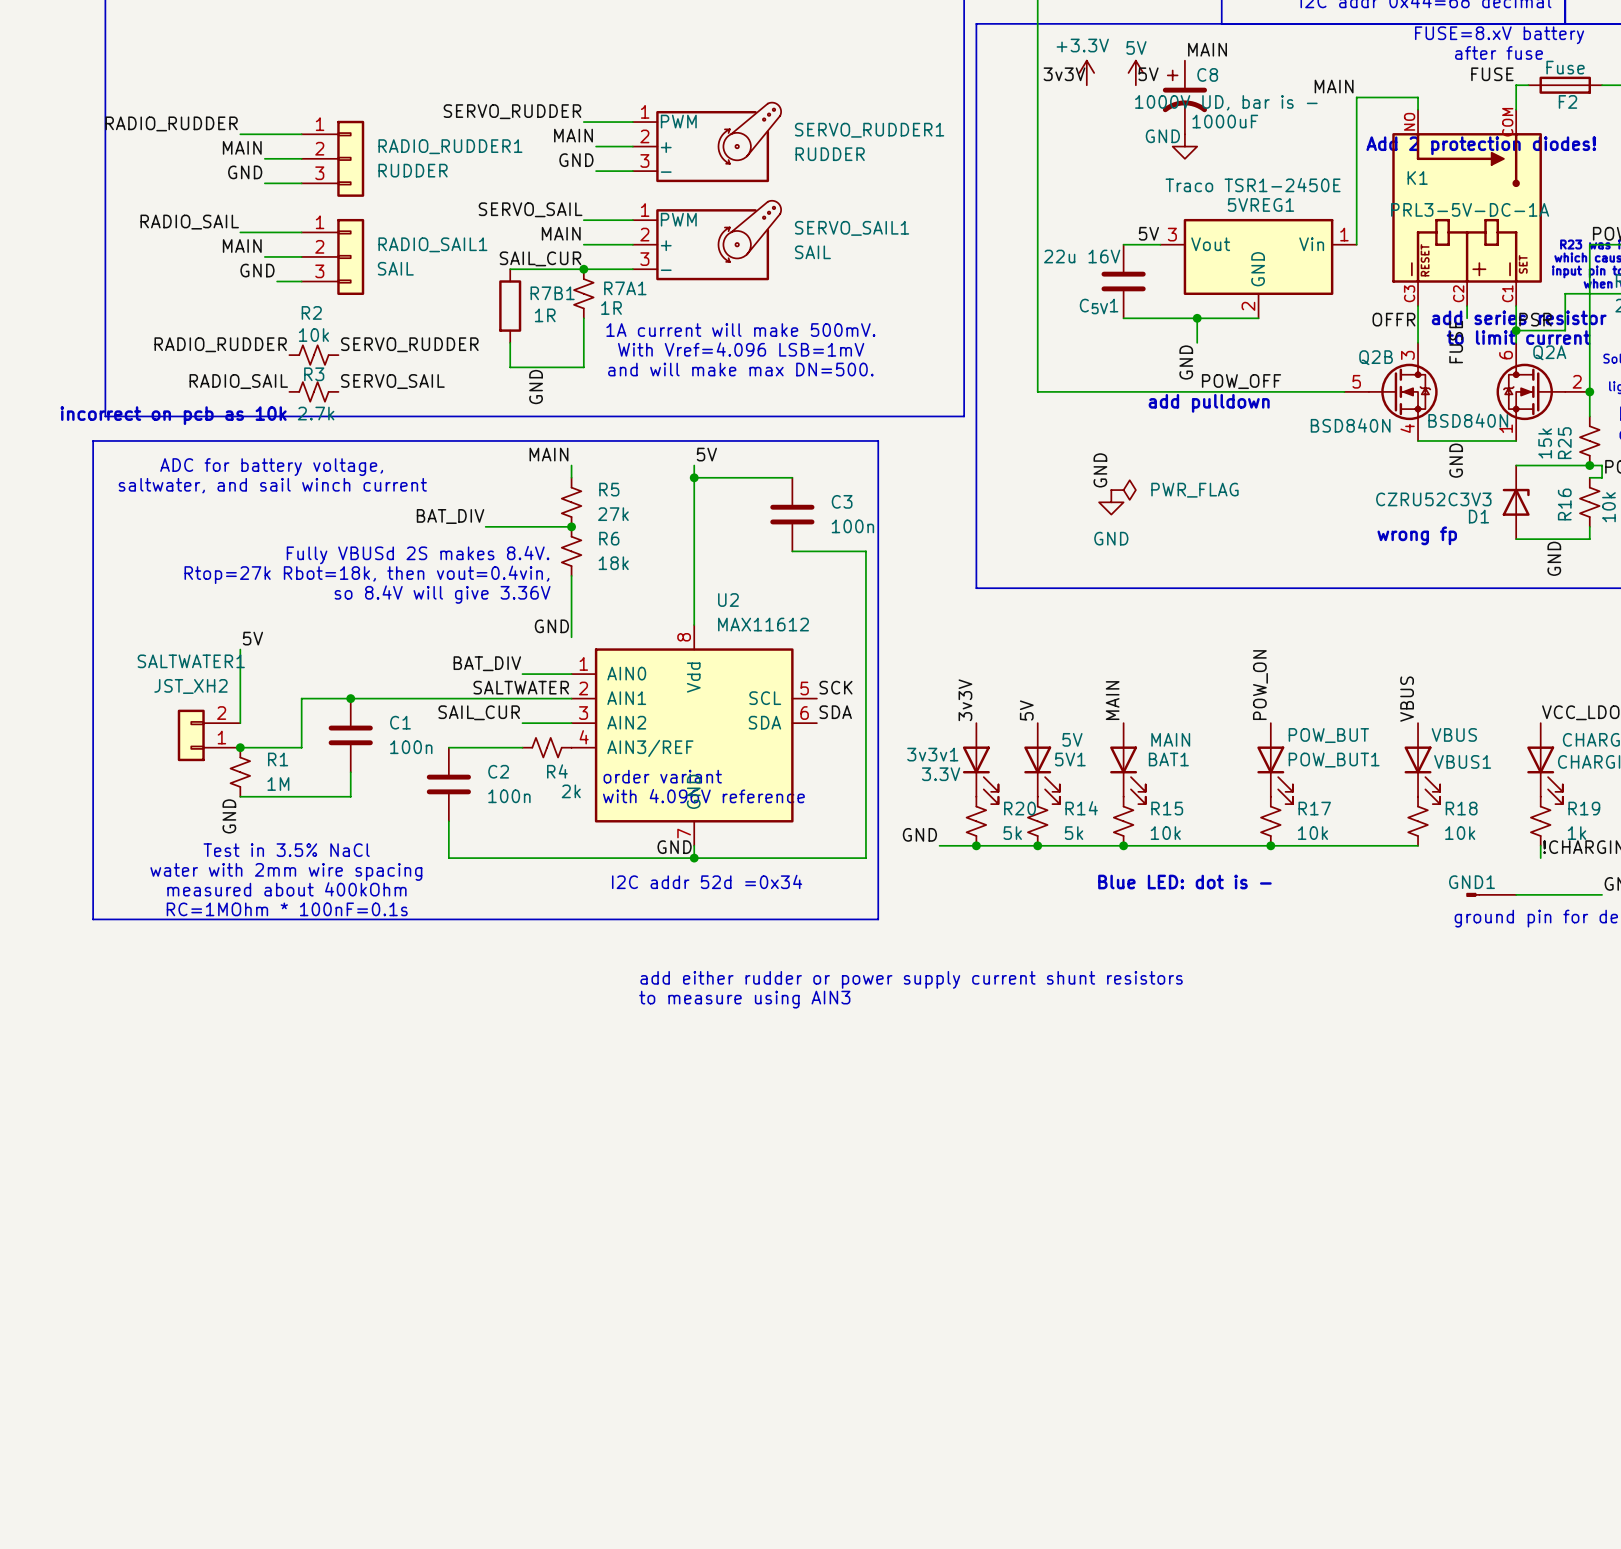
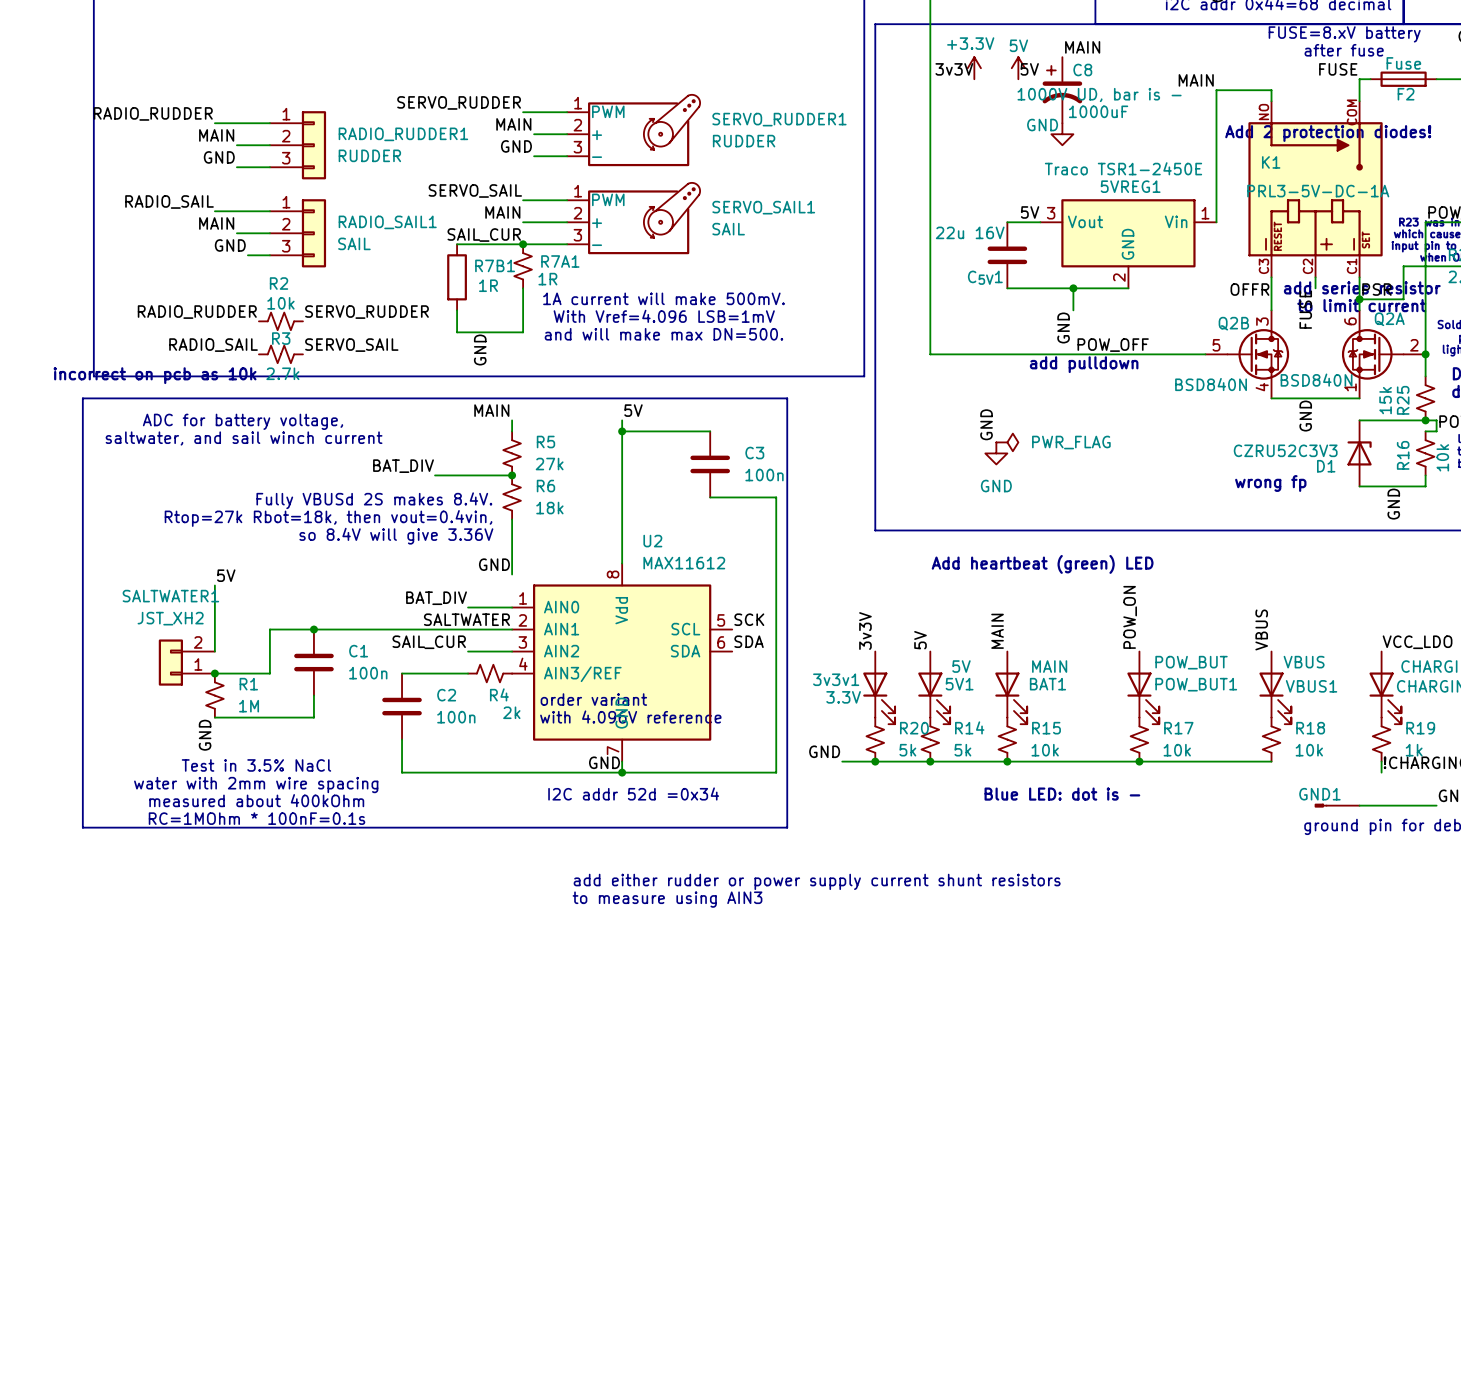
text: none -> Add heartbeat (green) LED (1042, 564)

